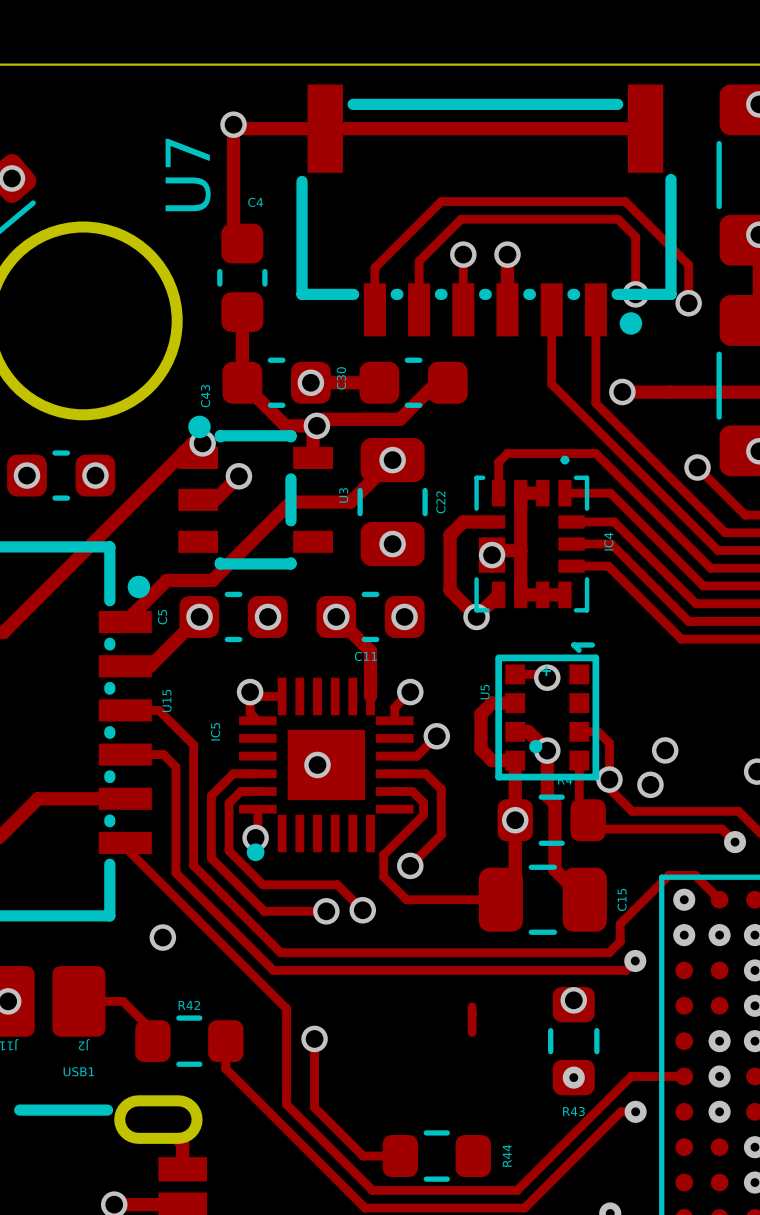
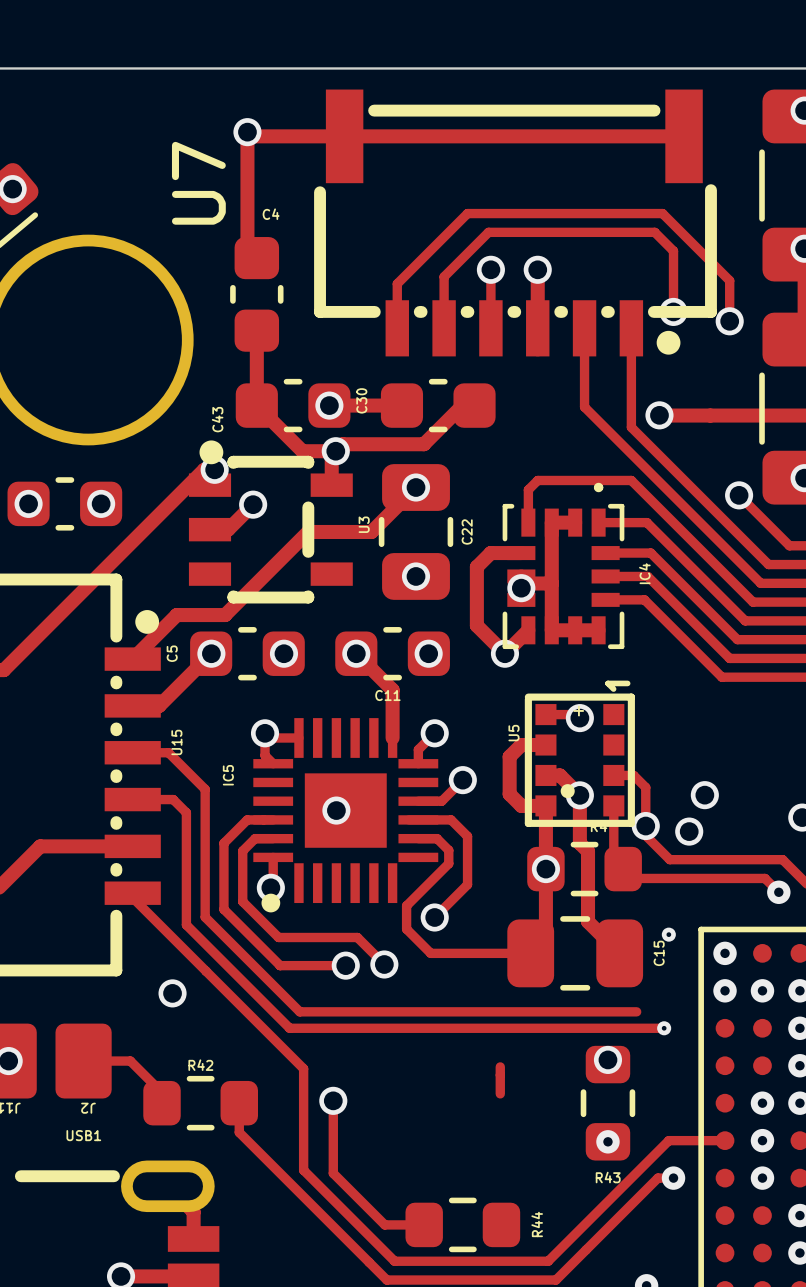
via: none -> (668, 934)
track: (719, 899) (695, 875) (668, 875) (620, 924) (620, 941) (609, 952) (280, 952) -> (636, 1011) (299, 1011) (297, 1009)
via size: [624, 949, 647, 973] -> [657, 1021, 672, 1036]

